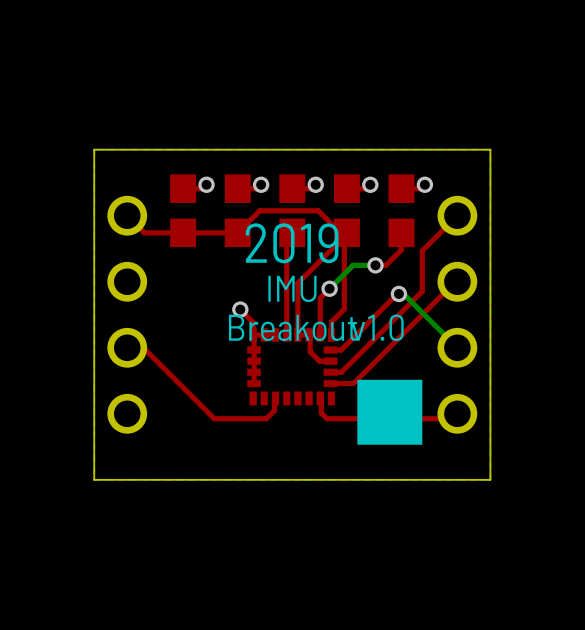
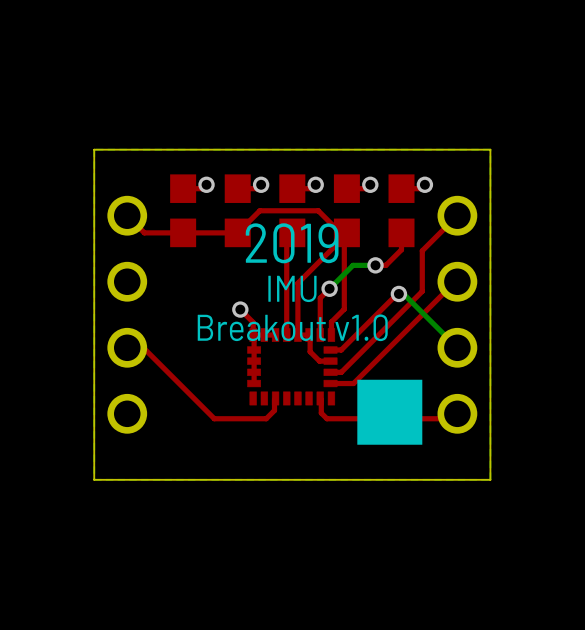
text: Breakout (292, 327) -> Breakout v1.0 (292, 327)
text: v1.0 (377, 327) -> none

